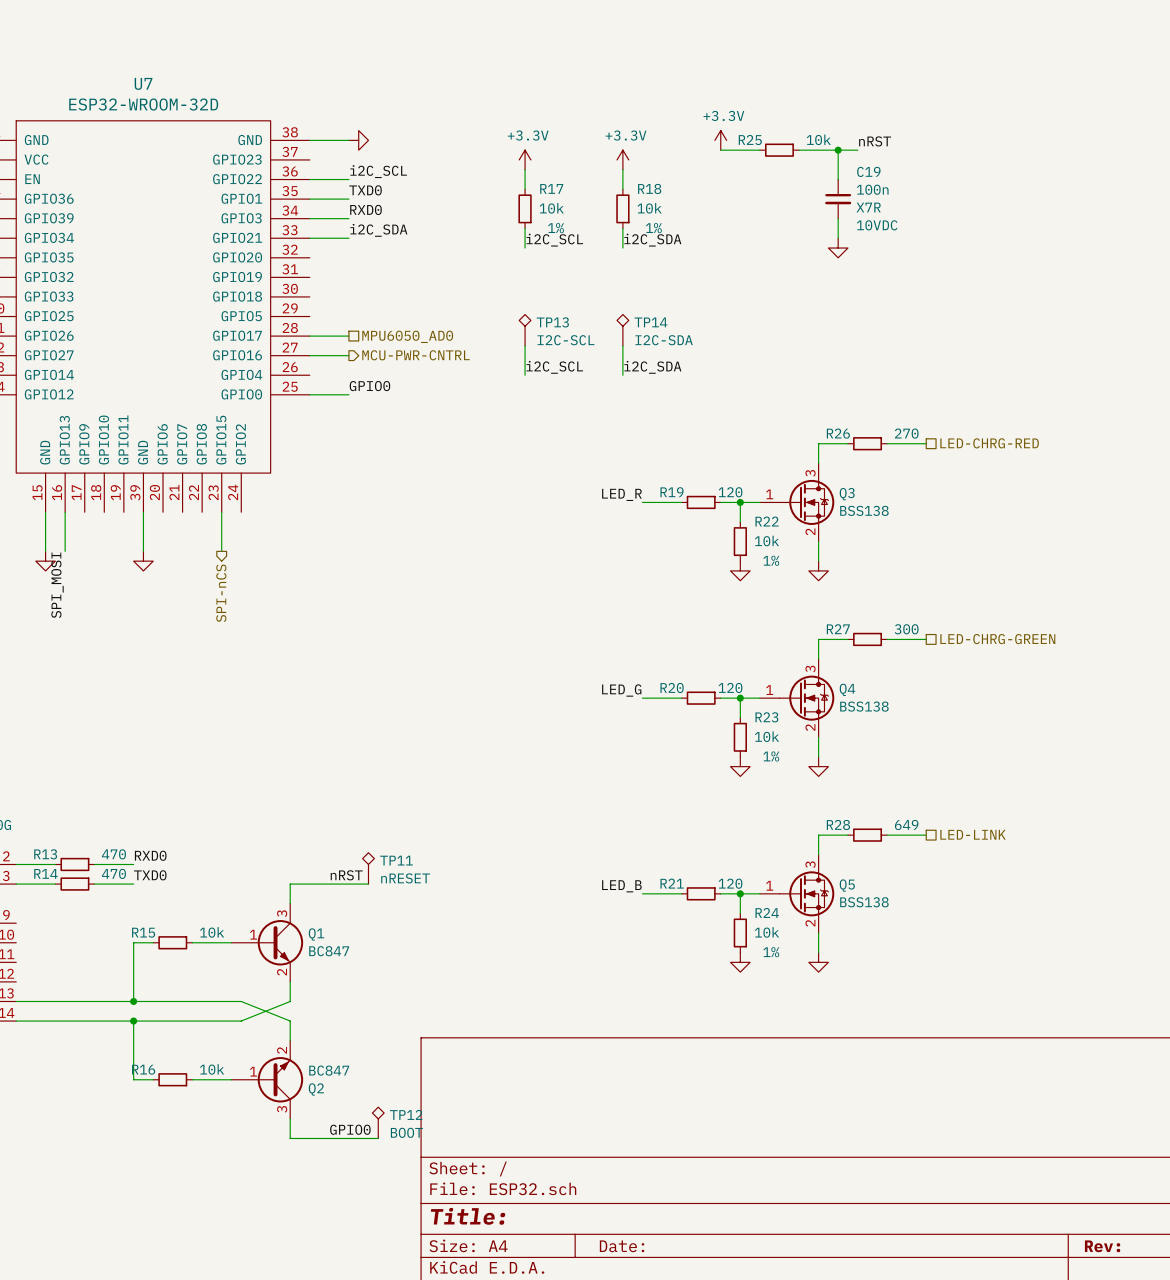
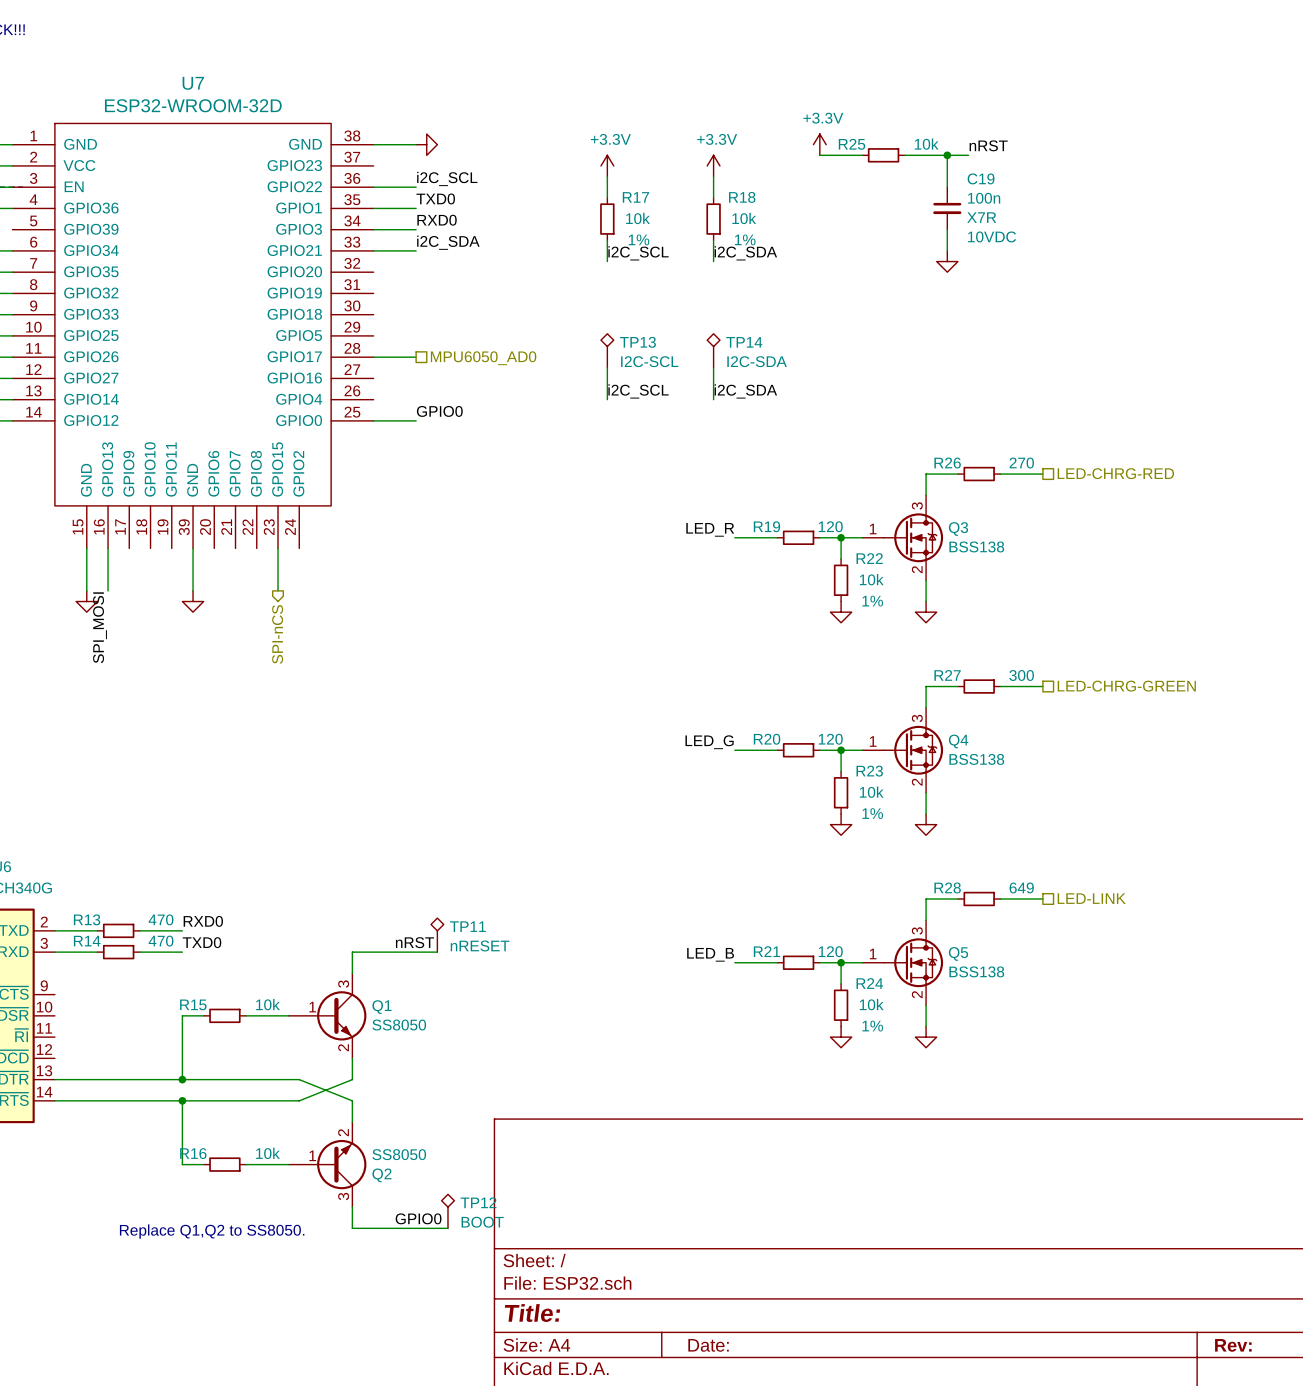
wire: (309, 355) (348, 355) -> none
hierarchical label: MCU-PWR-CNTRL (416, 355) -> none
Q1 value: BC847 (329, 951) -> SS8050 (399, 1025)
Q2 value: BC847 (329, 1070) -> SS8050 (399, 1154)
text: none -> Replace Q1,Q2 to SS8050. (212, 1231)

